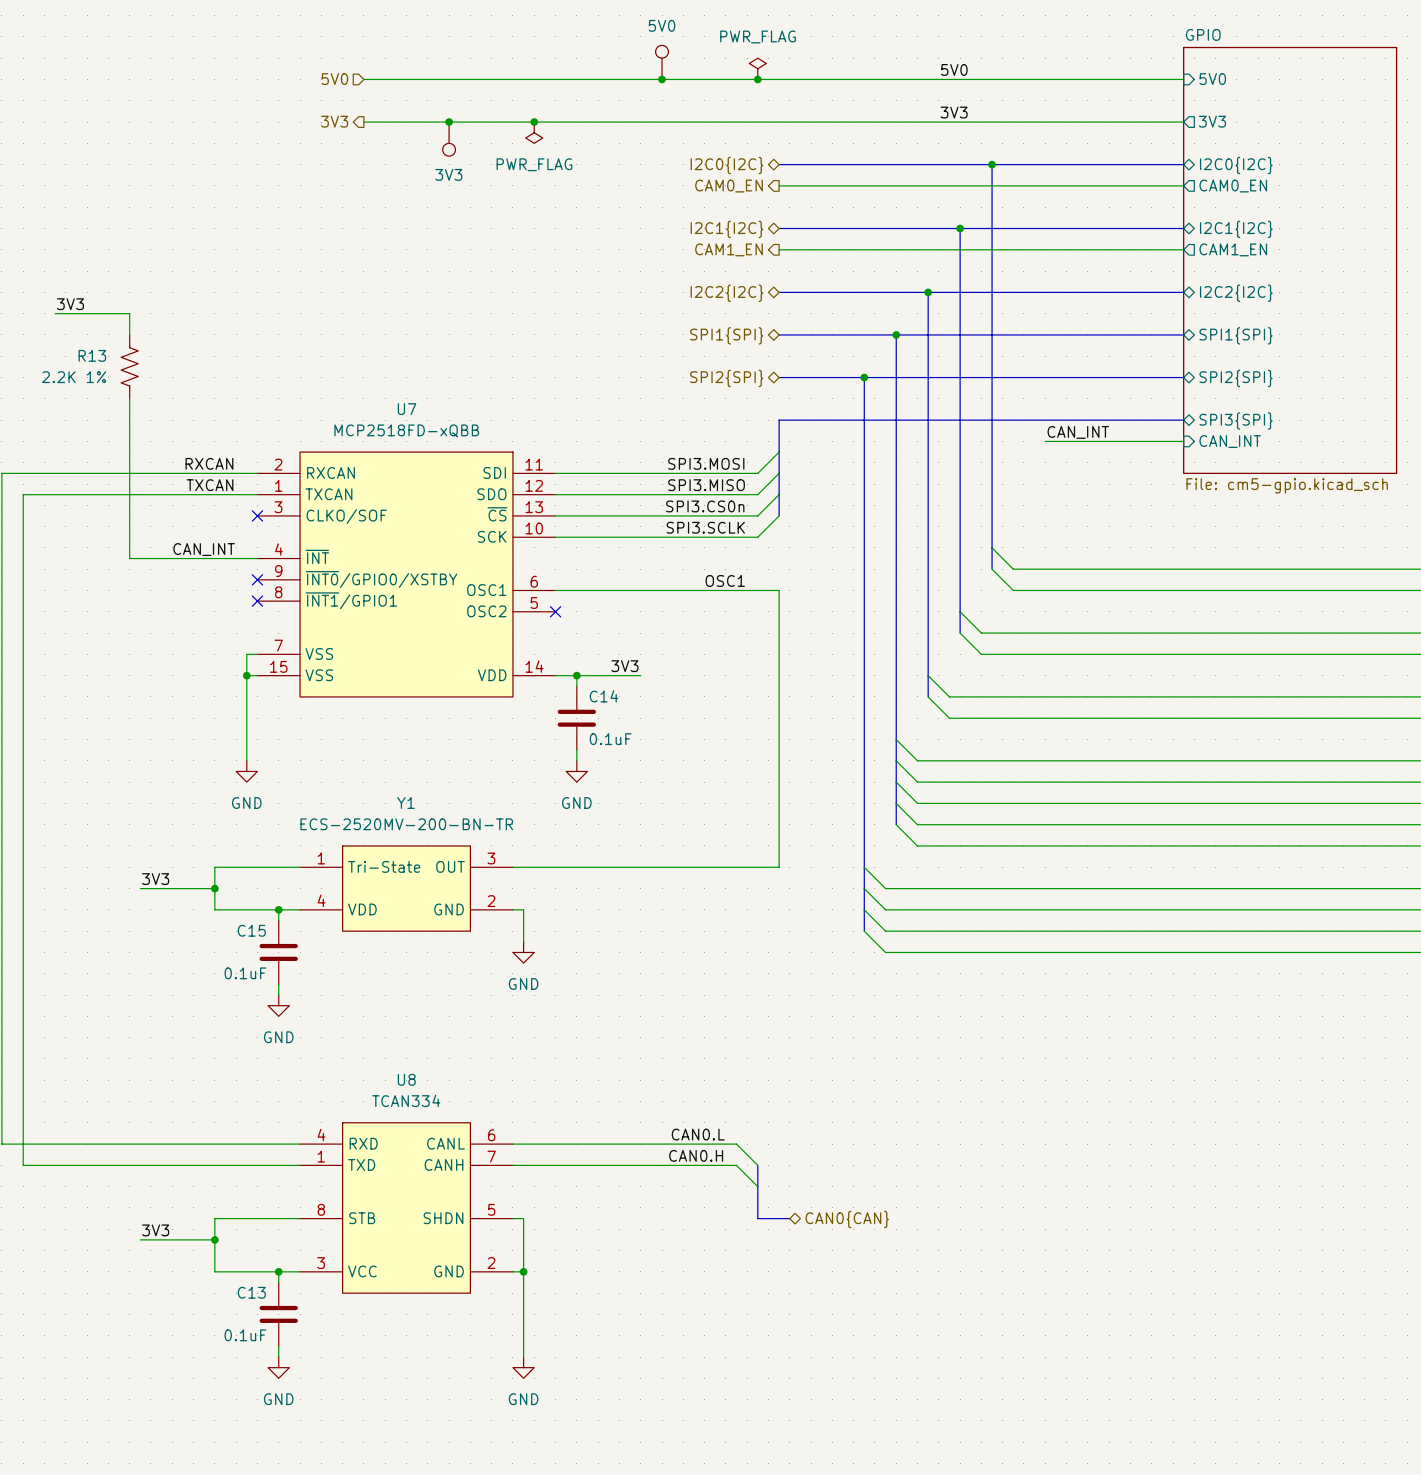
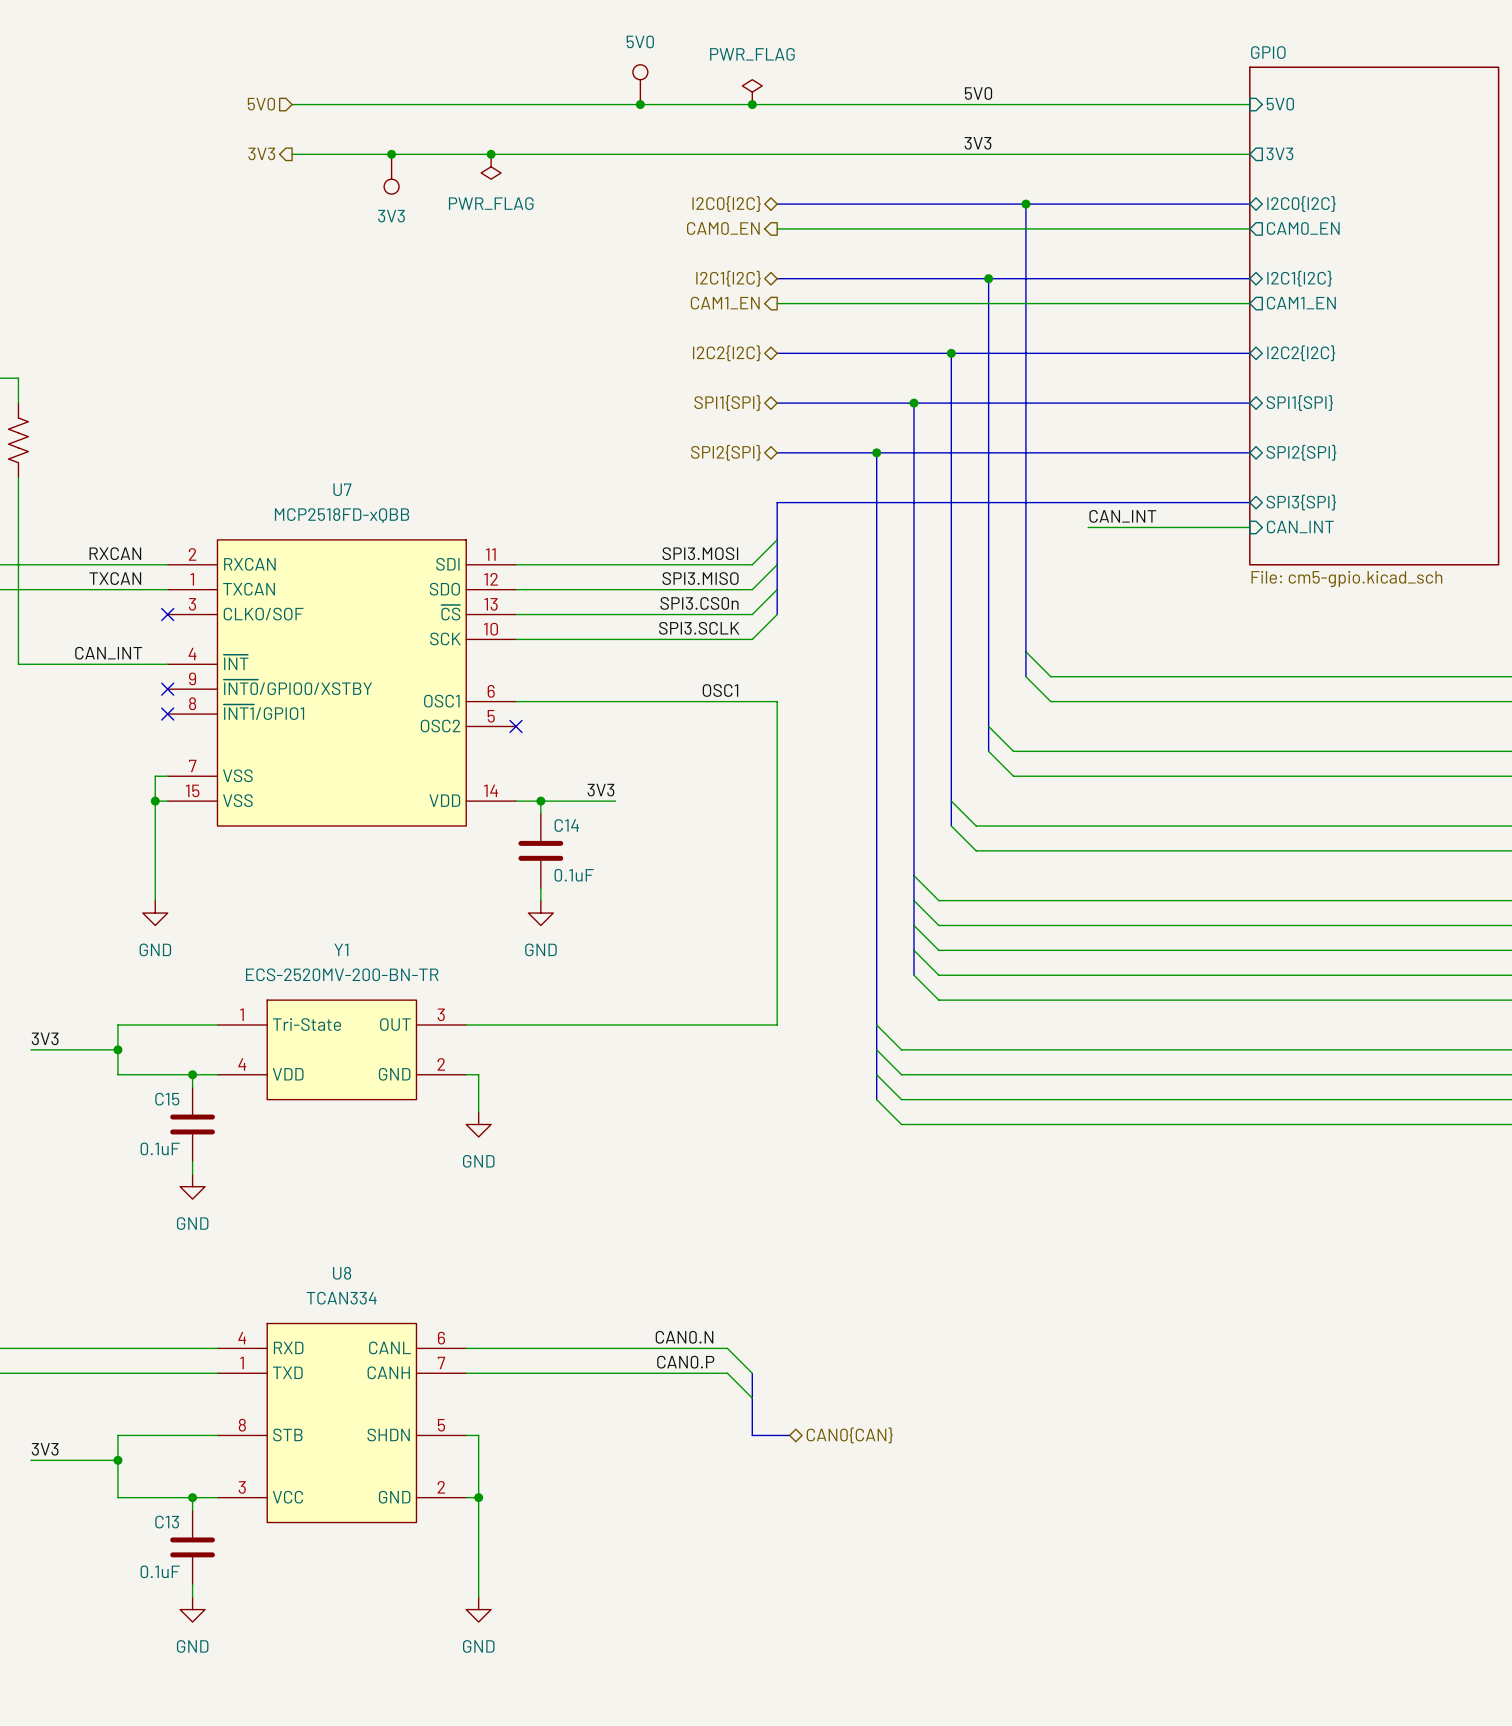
label: CAN0.L (698, 1134) -> CAN0.N (684, 1337)
label: CAN0.H (696, 1155) -> CAN0.P (685, 1362)

